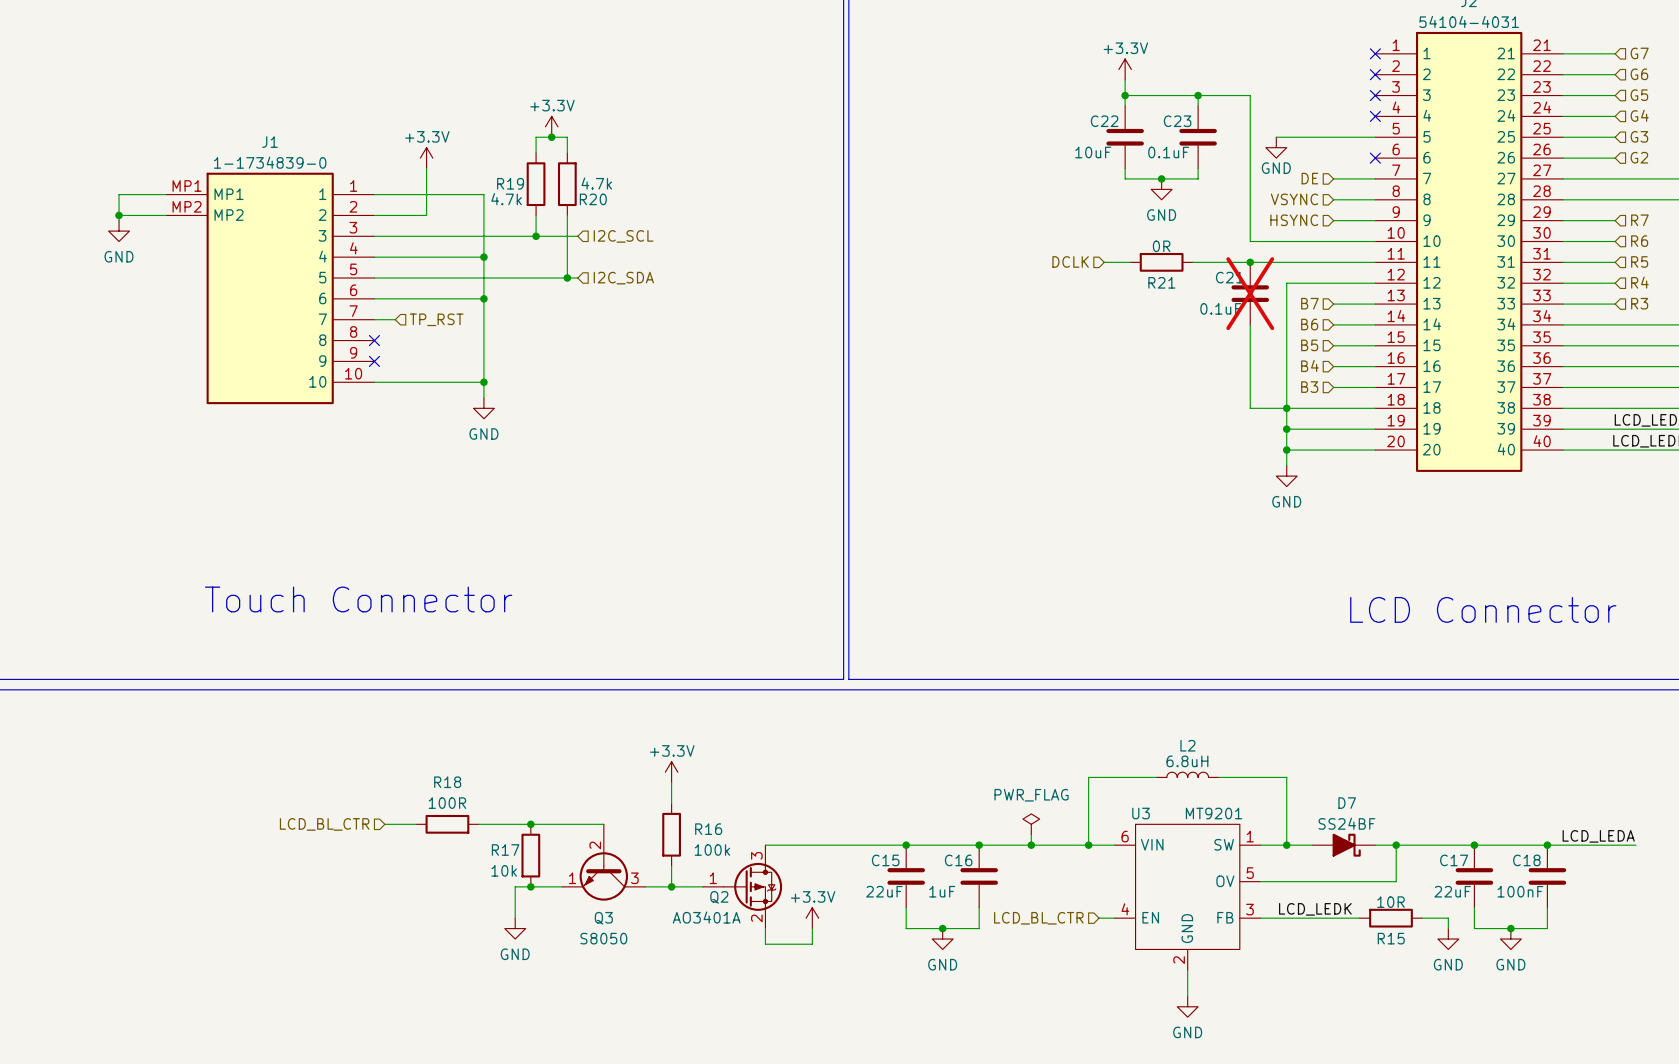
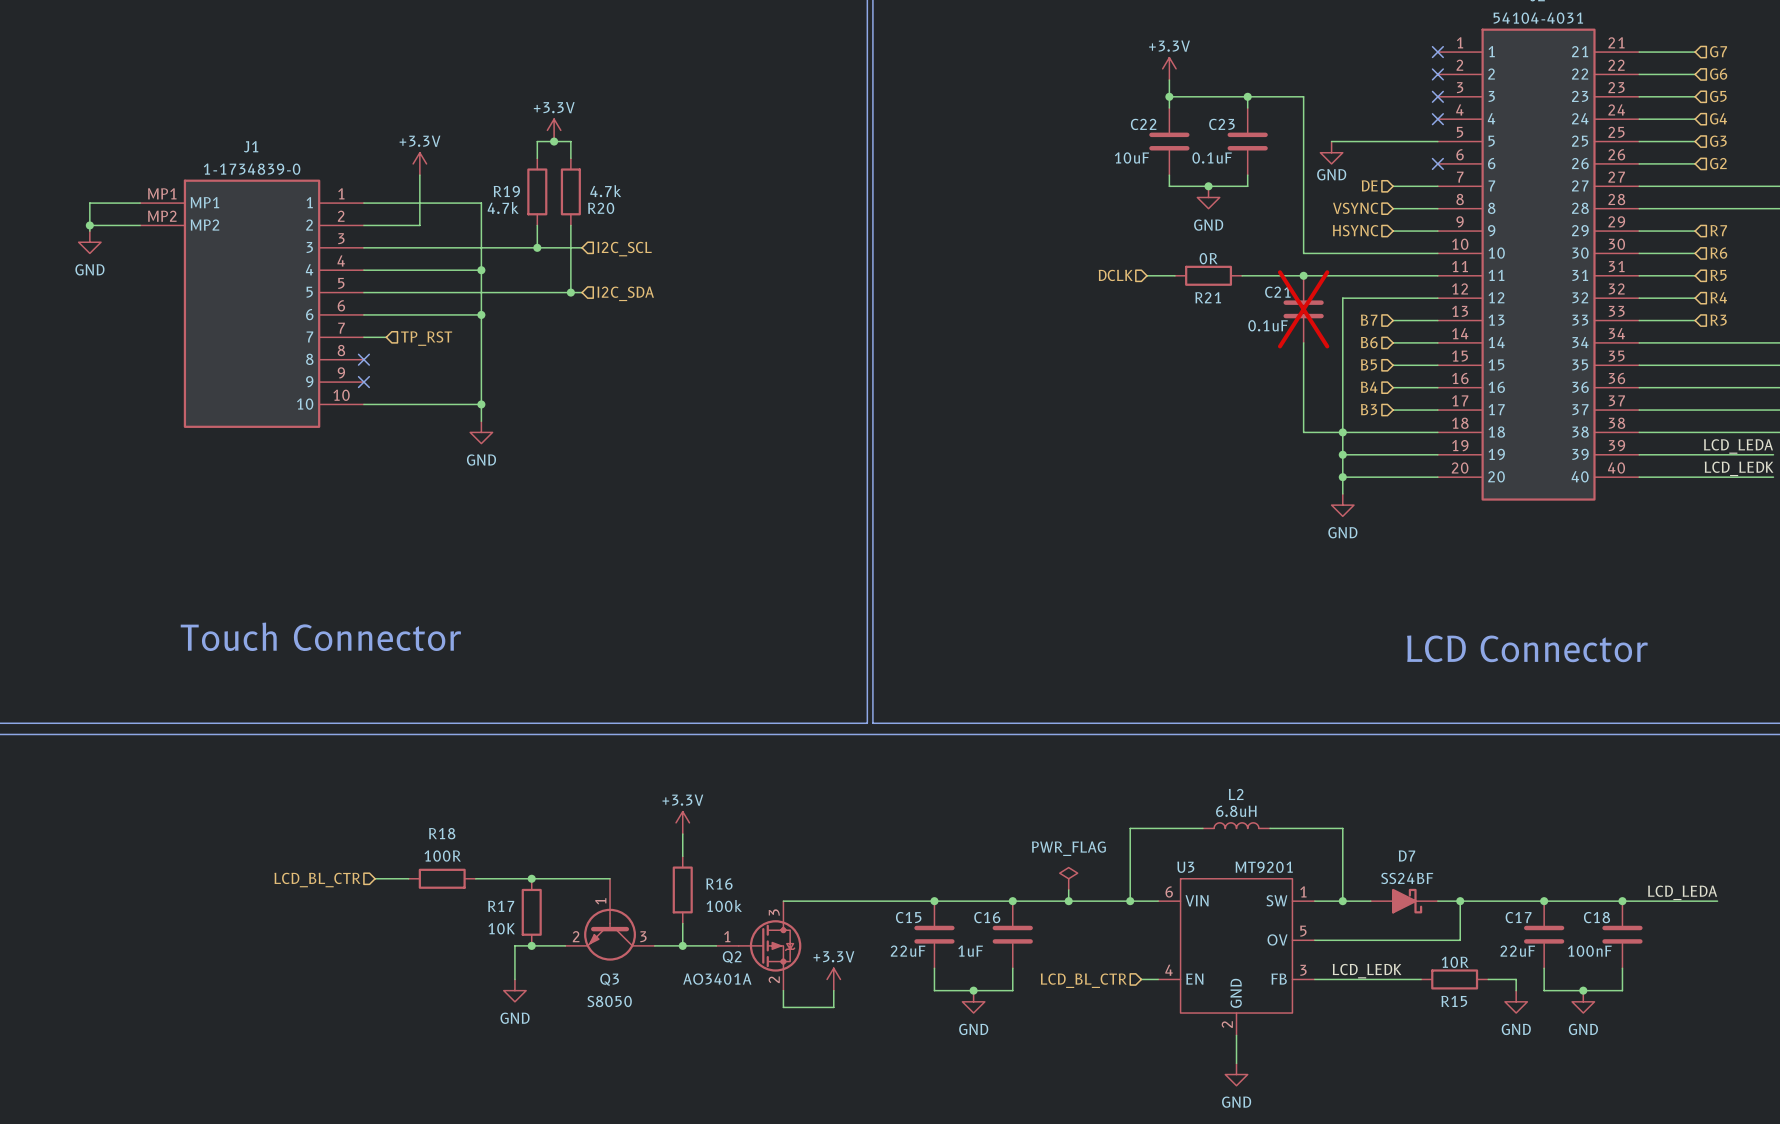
Q3 pin number: 2 (595, 845) -> 1 (600, 901)
R17 value: 10k (504, 870) -> 10K (501, 928)
Q3 pin number: 1 (572, 878) -> 2 (576, 936)

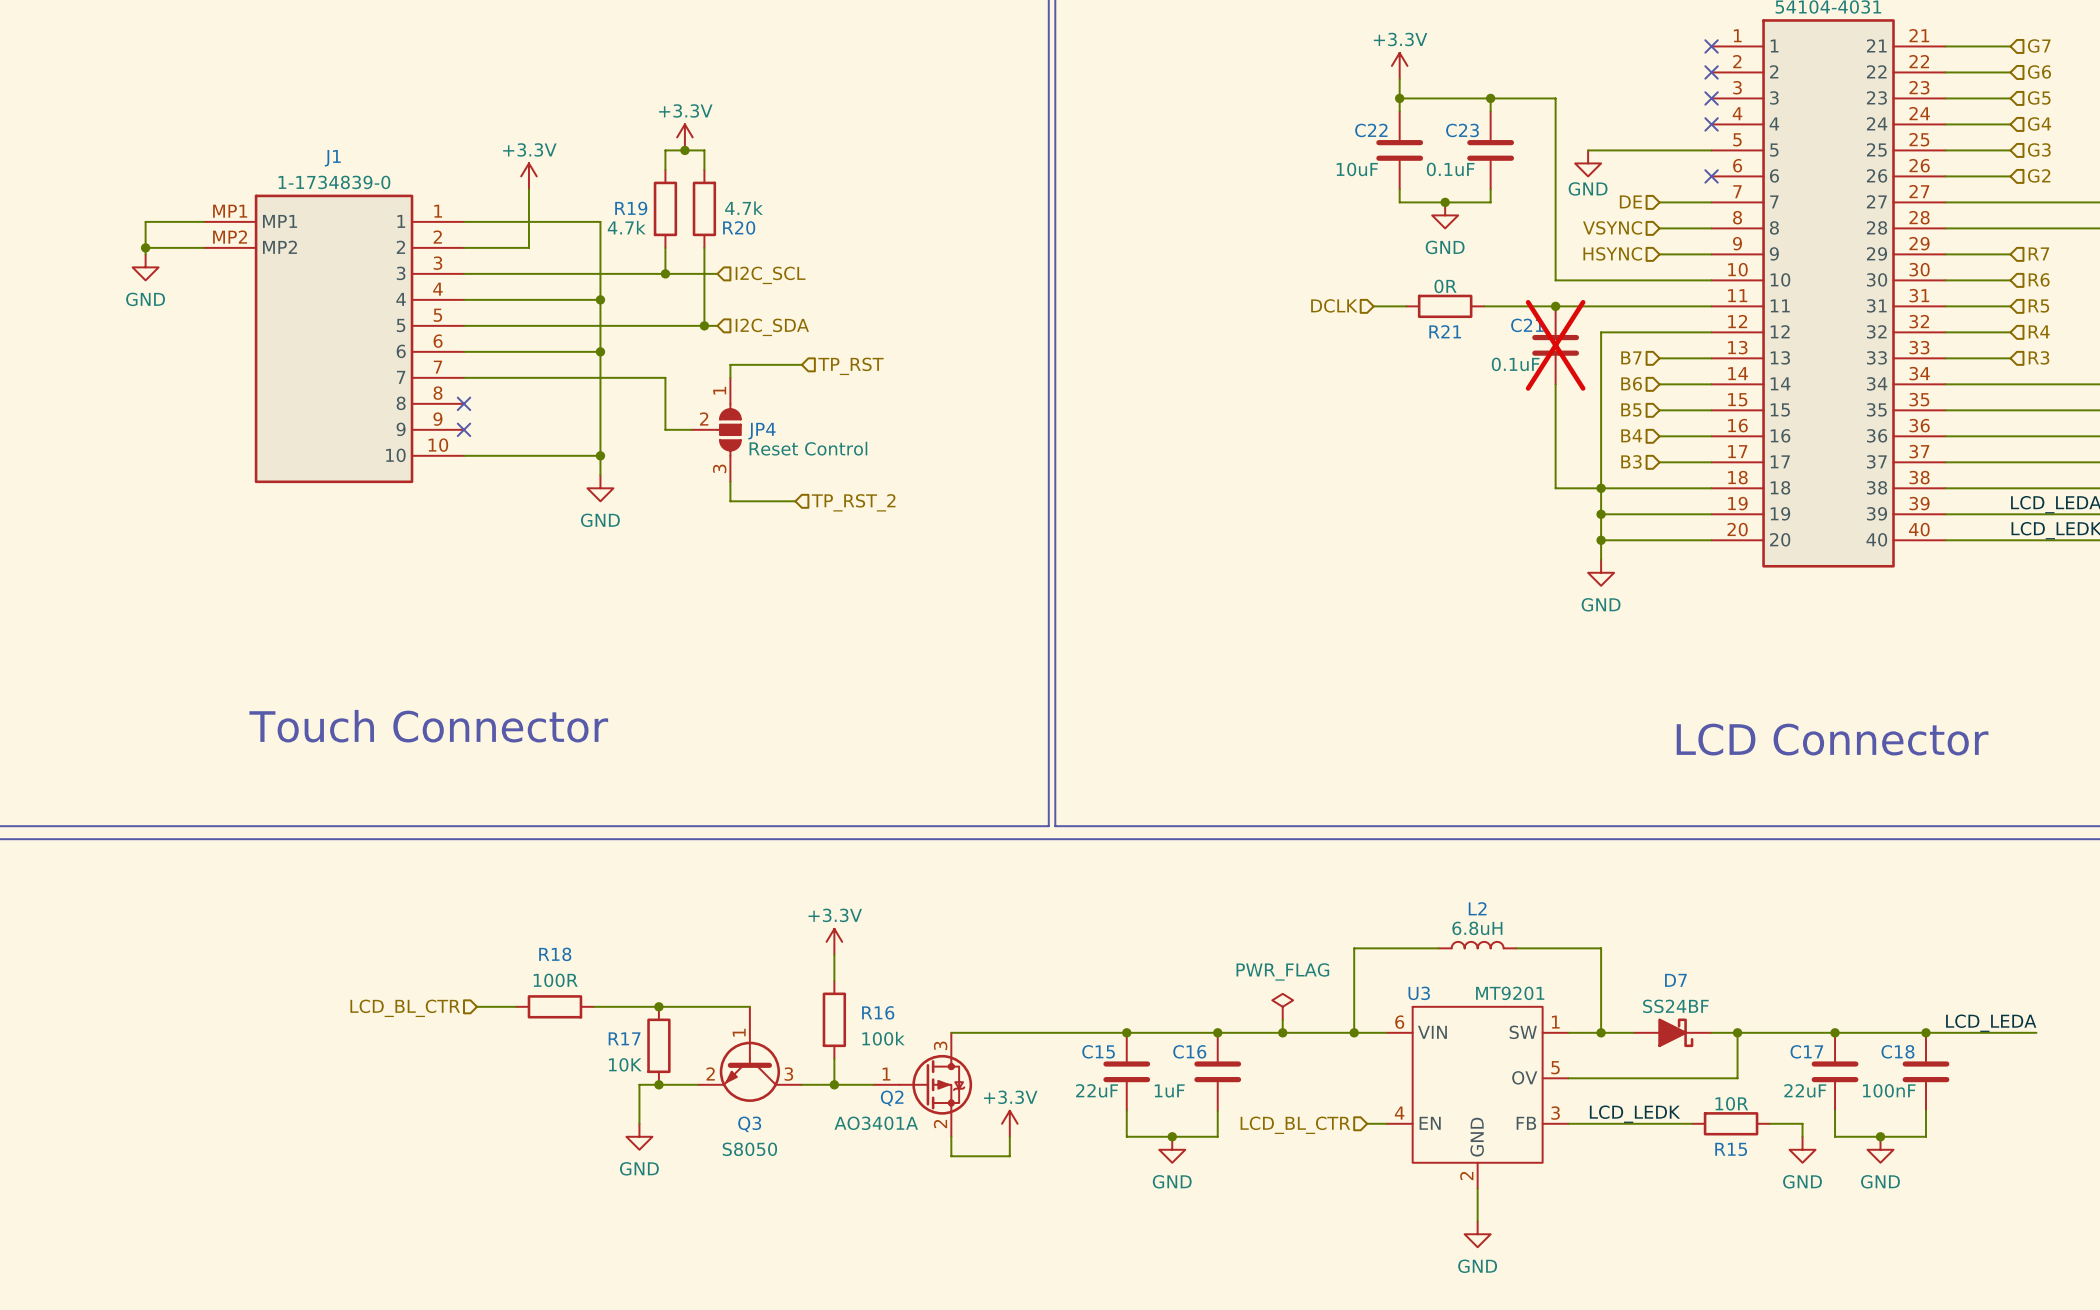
wire: none -> (801, 364) (730, 364) (730, 377)
hierarchical label: none -> TP_RST (850, 366)
wire: none -> (489, 377) (665, 377) (665, 429) (691, 429)
hierarchical label: TP_RST (426, 338) -> none
JP4: none -> Reset Control (716, 429)
wire: none -> (730, 481) (730, 501) (795, 501)
hierarchical label: none -> TP_RST_2 (853, 502)

